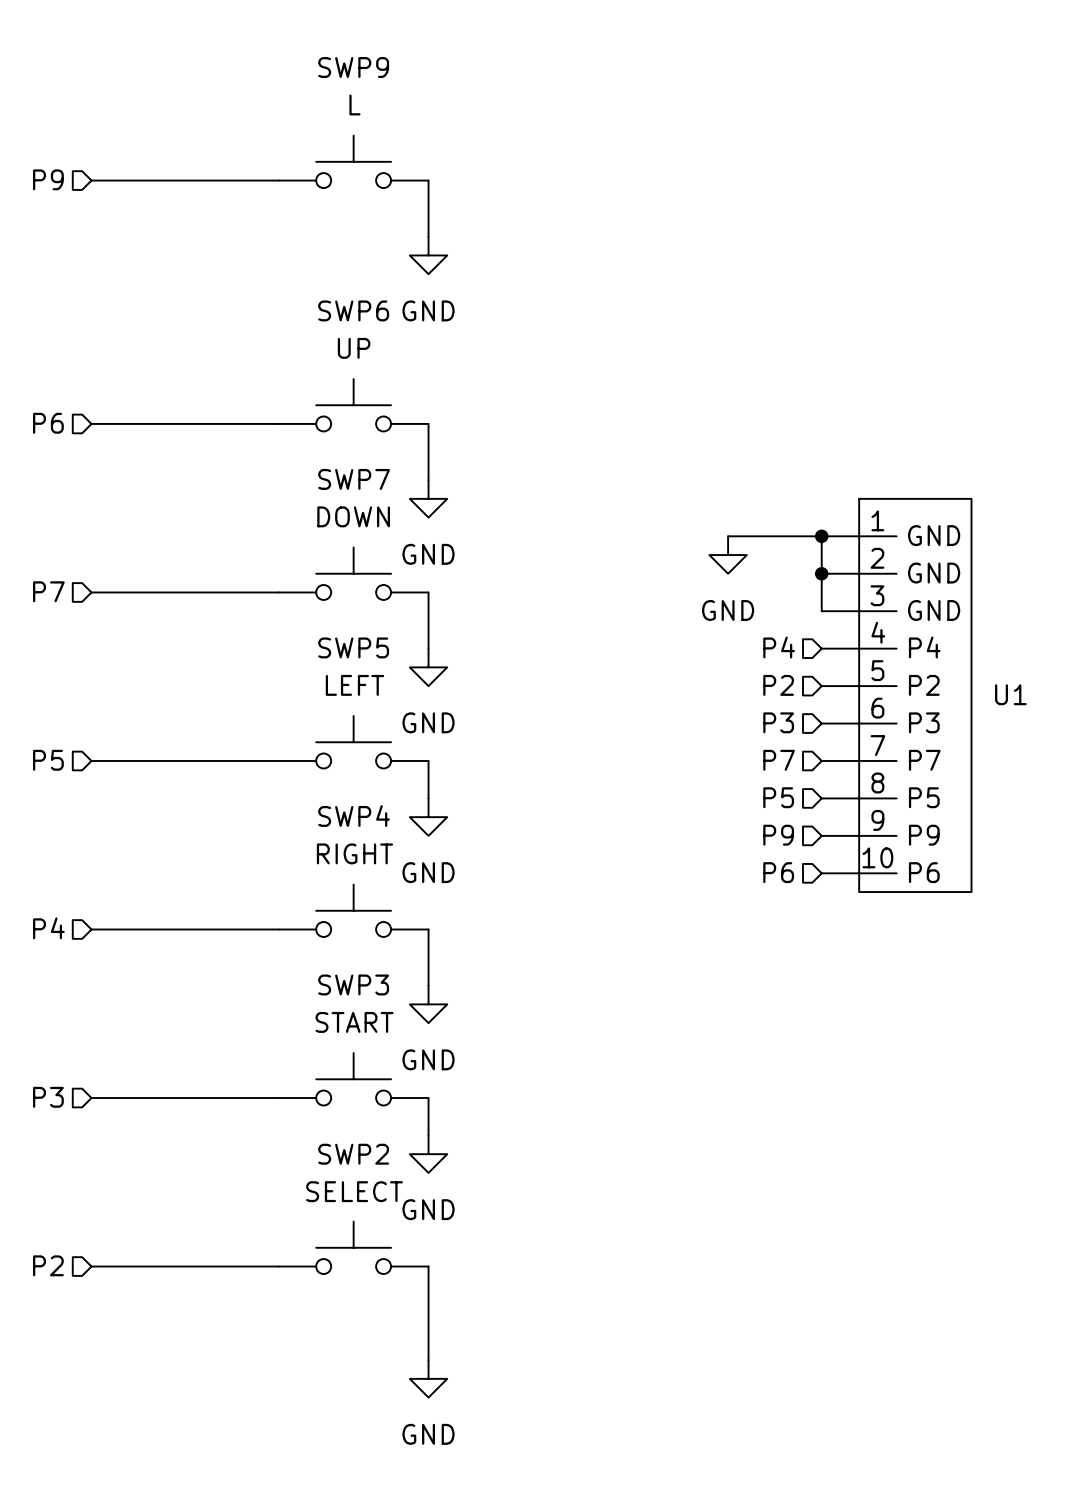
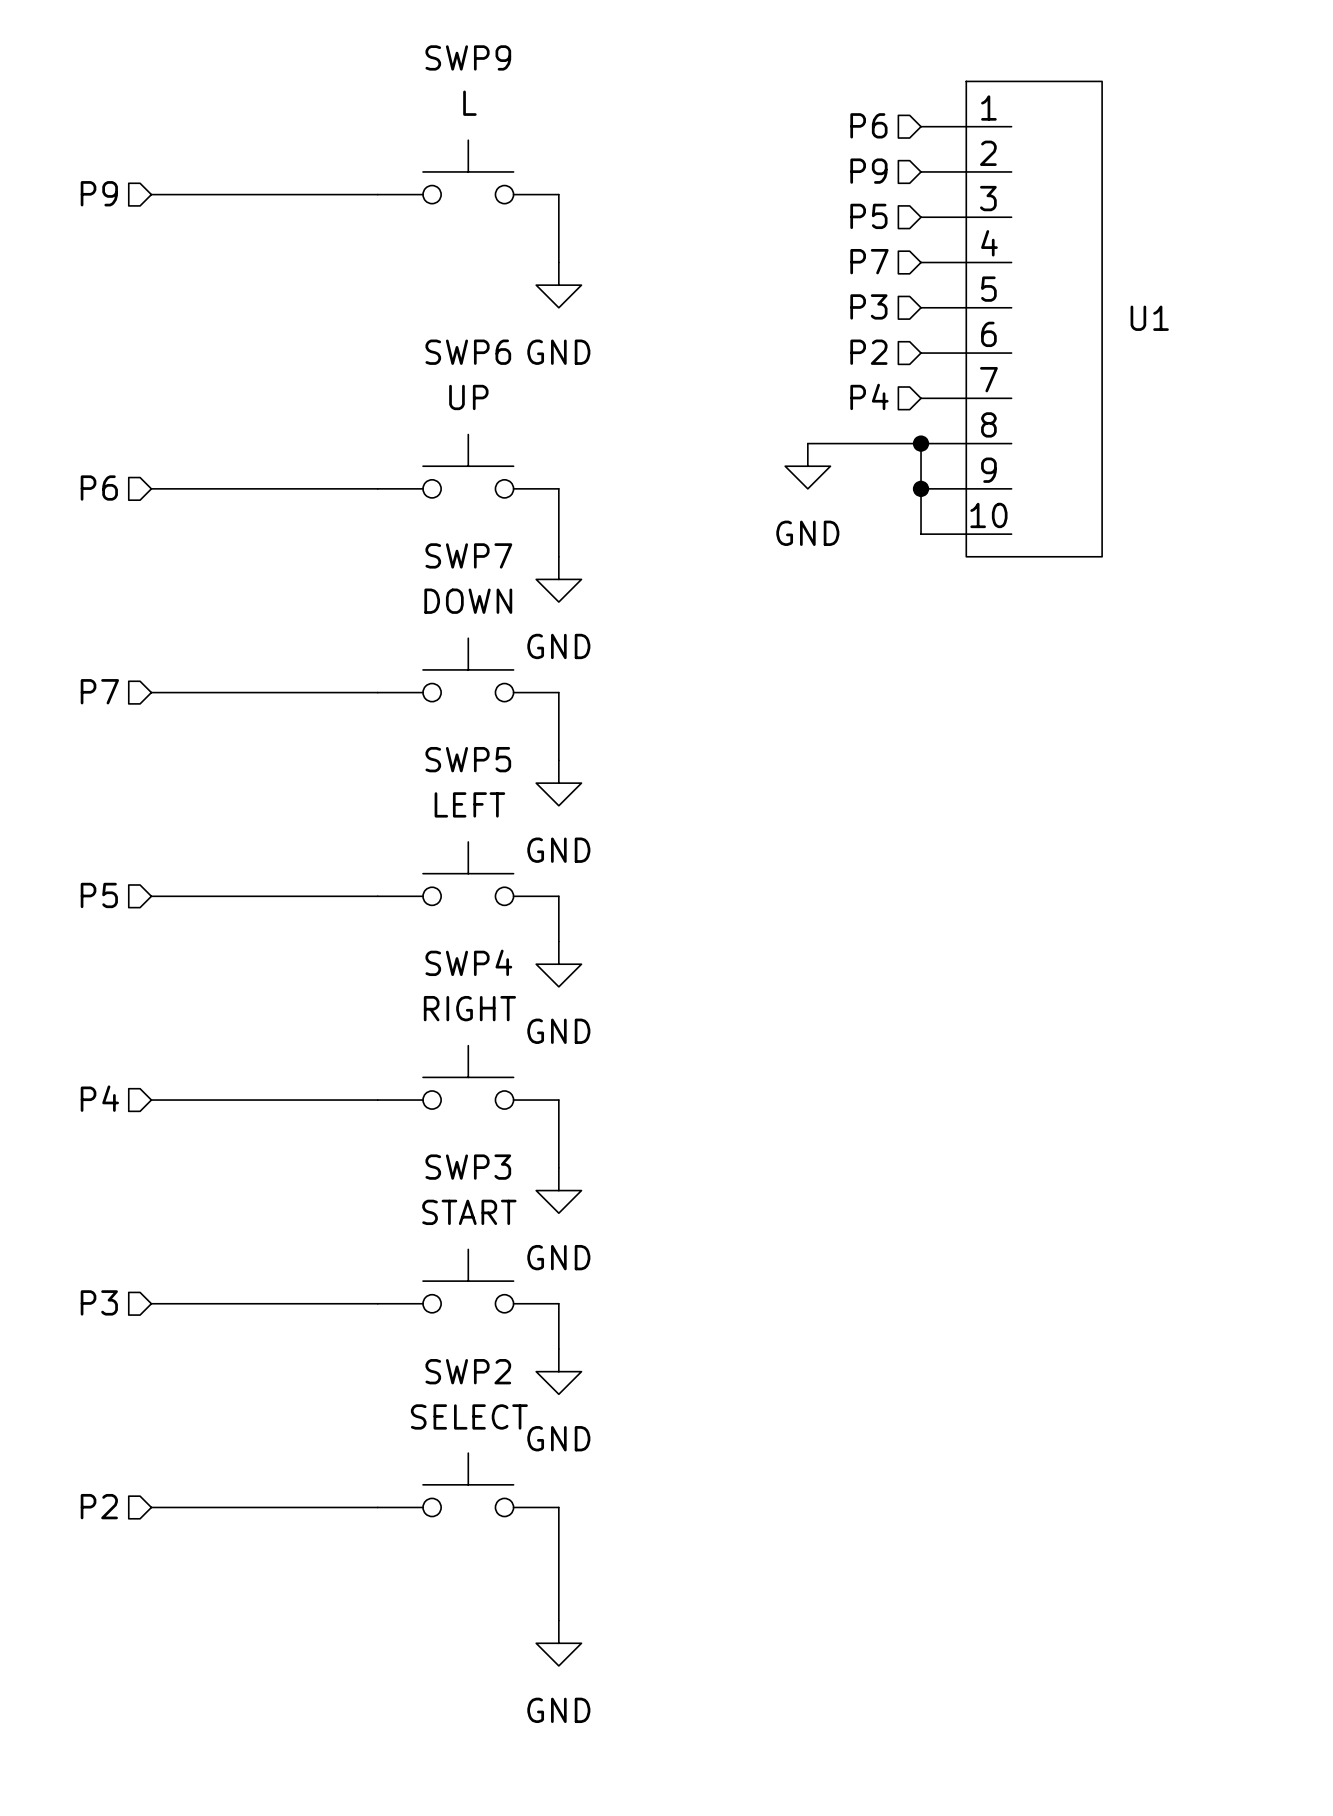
hierarchical label: none -> P6 (868, 125)
wire: none -> (921, 126) (966, 126)
hierarchical label: none -> P9 (868, 171)
wire: none -> (921, 171) (966, 171)
hierarchical label: none -> P5 (868, 216)
wire: none -> (921, 217) (966, 217)
hierarchical label: none -> P7 (869, 261)
hierarchical label: none -> P3 (868, 306)
wire: none -> (921, 307) (966, 307)
hierarchical label: none -> P2 (868, 352)
junction: none -> (921, 443)
junction: none -> (921, 488)
U1 symbol: [859, 498, 972, 893] -> [966, 81, 1103, 557]
wire: (728, 536) (859, 536) -> (807, 443) (966, 443)
wire: (821, 536) (821, 611) (859, 611) -> (921, 443) (921, 534) (966, 534)
junction: (821, 536) -> none
power symbol position: GND (728, 555) -> GND (807, 466)
wire: (821, 573) (859, 573) -> (921, 262) (966, 262)
junction: (821, 573) -> none
hierarchical label position: P4 (779, 647) -> P4 (869, 396)
wire: (821, 648) (859, 648) -> (921, 353) (966, 353)
hierarchical label: P2 (778, 685) -> none
wire: (821, 686) (859, 686) -> (921, 398) (966, 398)
hierarchical label: P3 (778, 722) -> none
wire: (821, 723) (859, 723) -> none
hierarchical label: P7 (779, 760) -> none
wire: (821, 760) (859, 760) -> (921, 488) (966, 488)
hierarchical label: P5 (778, 797) -> none
wire: (821, 798) (859, 798) -> none
hierarchical label: P9 (778, 835) -> none
wire: (821, 835) (859, 835) -> none
hierarchical label: P6 (778, 872) -> none
wire: (821, 873) (859, 873) -> none

